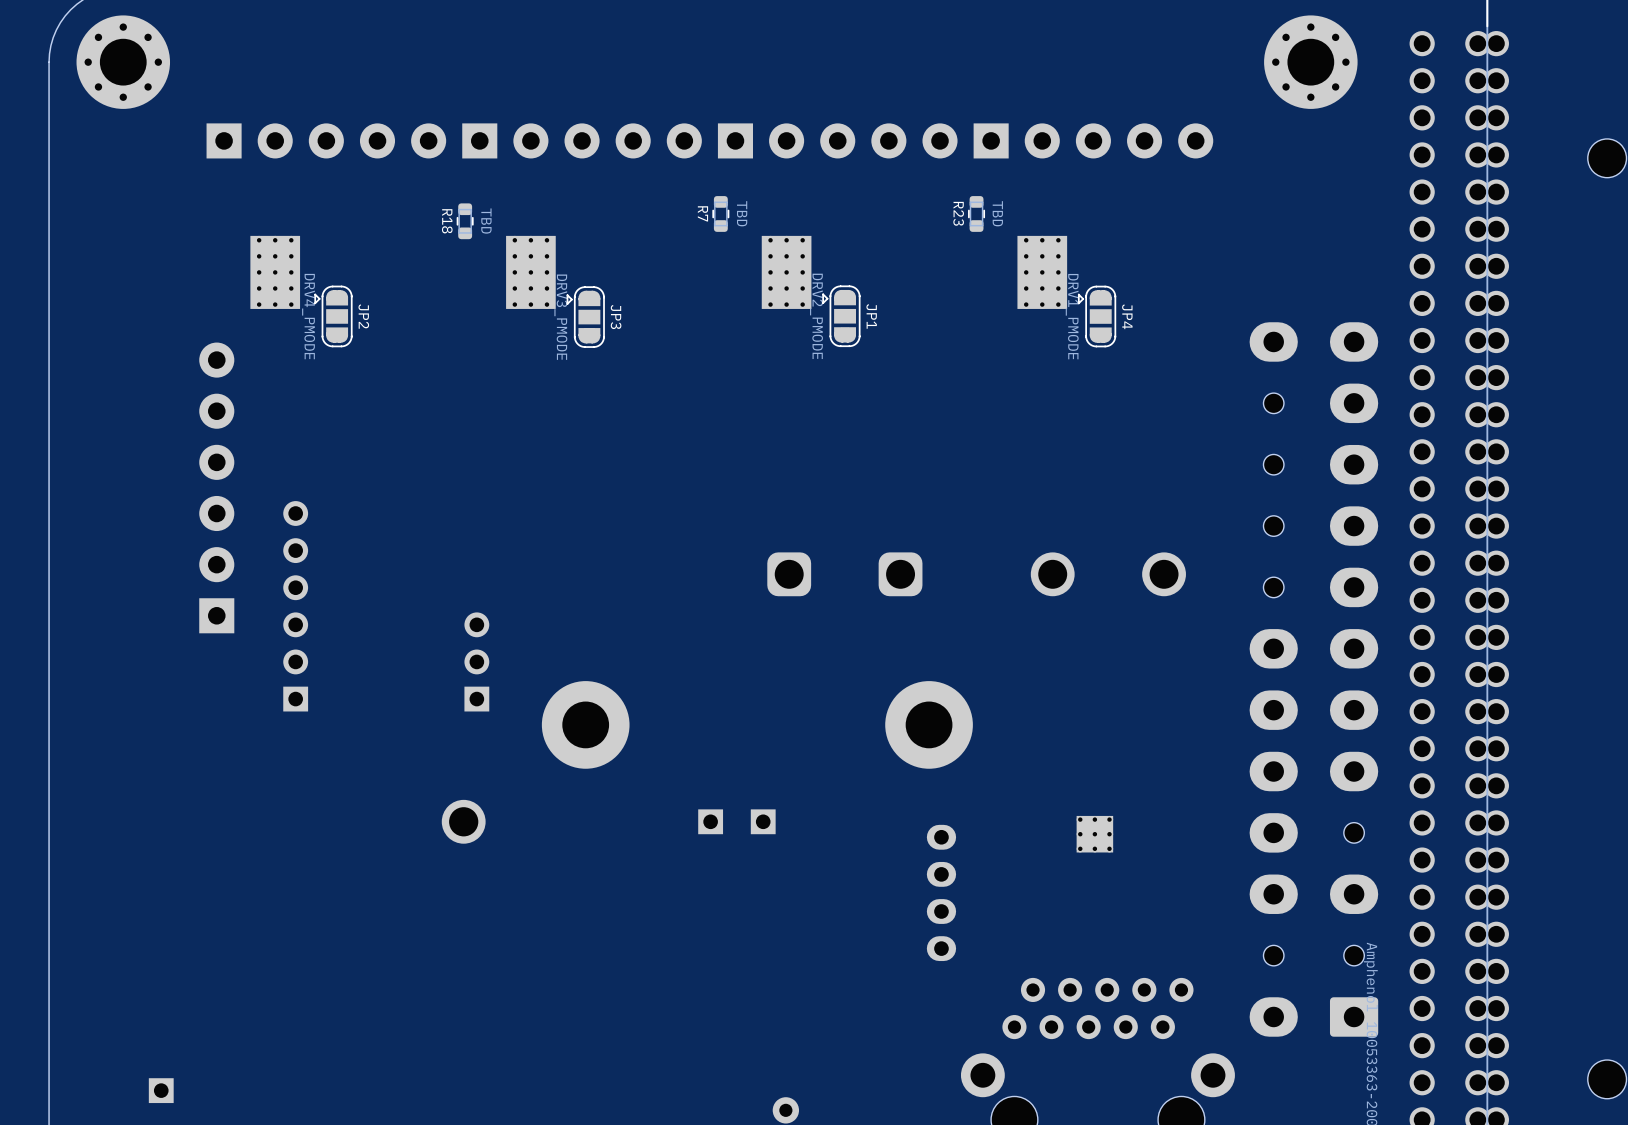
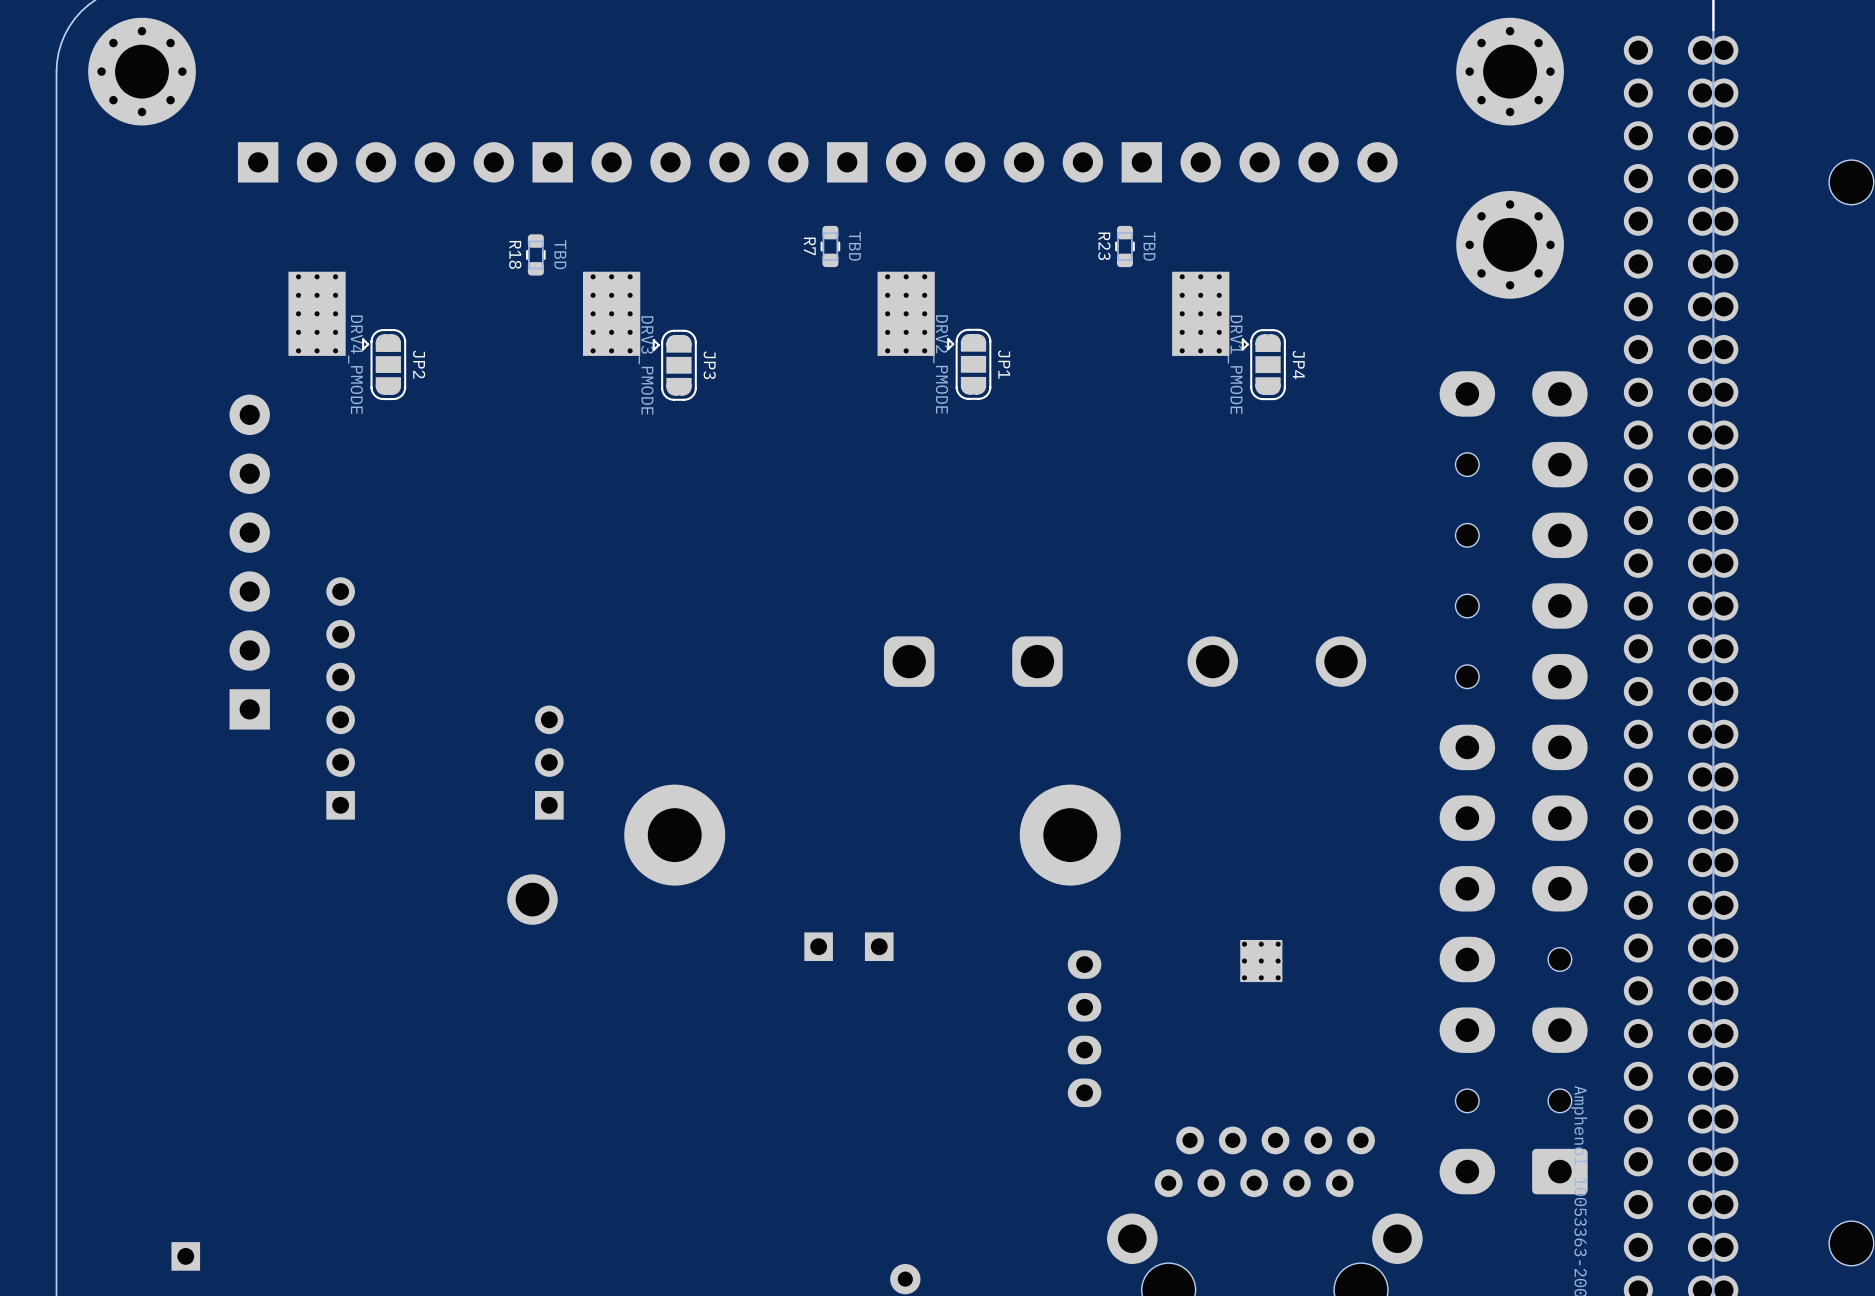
part: none -> (1510, 244)
part position: (463, 821) -> (532, 899)

